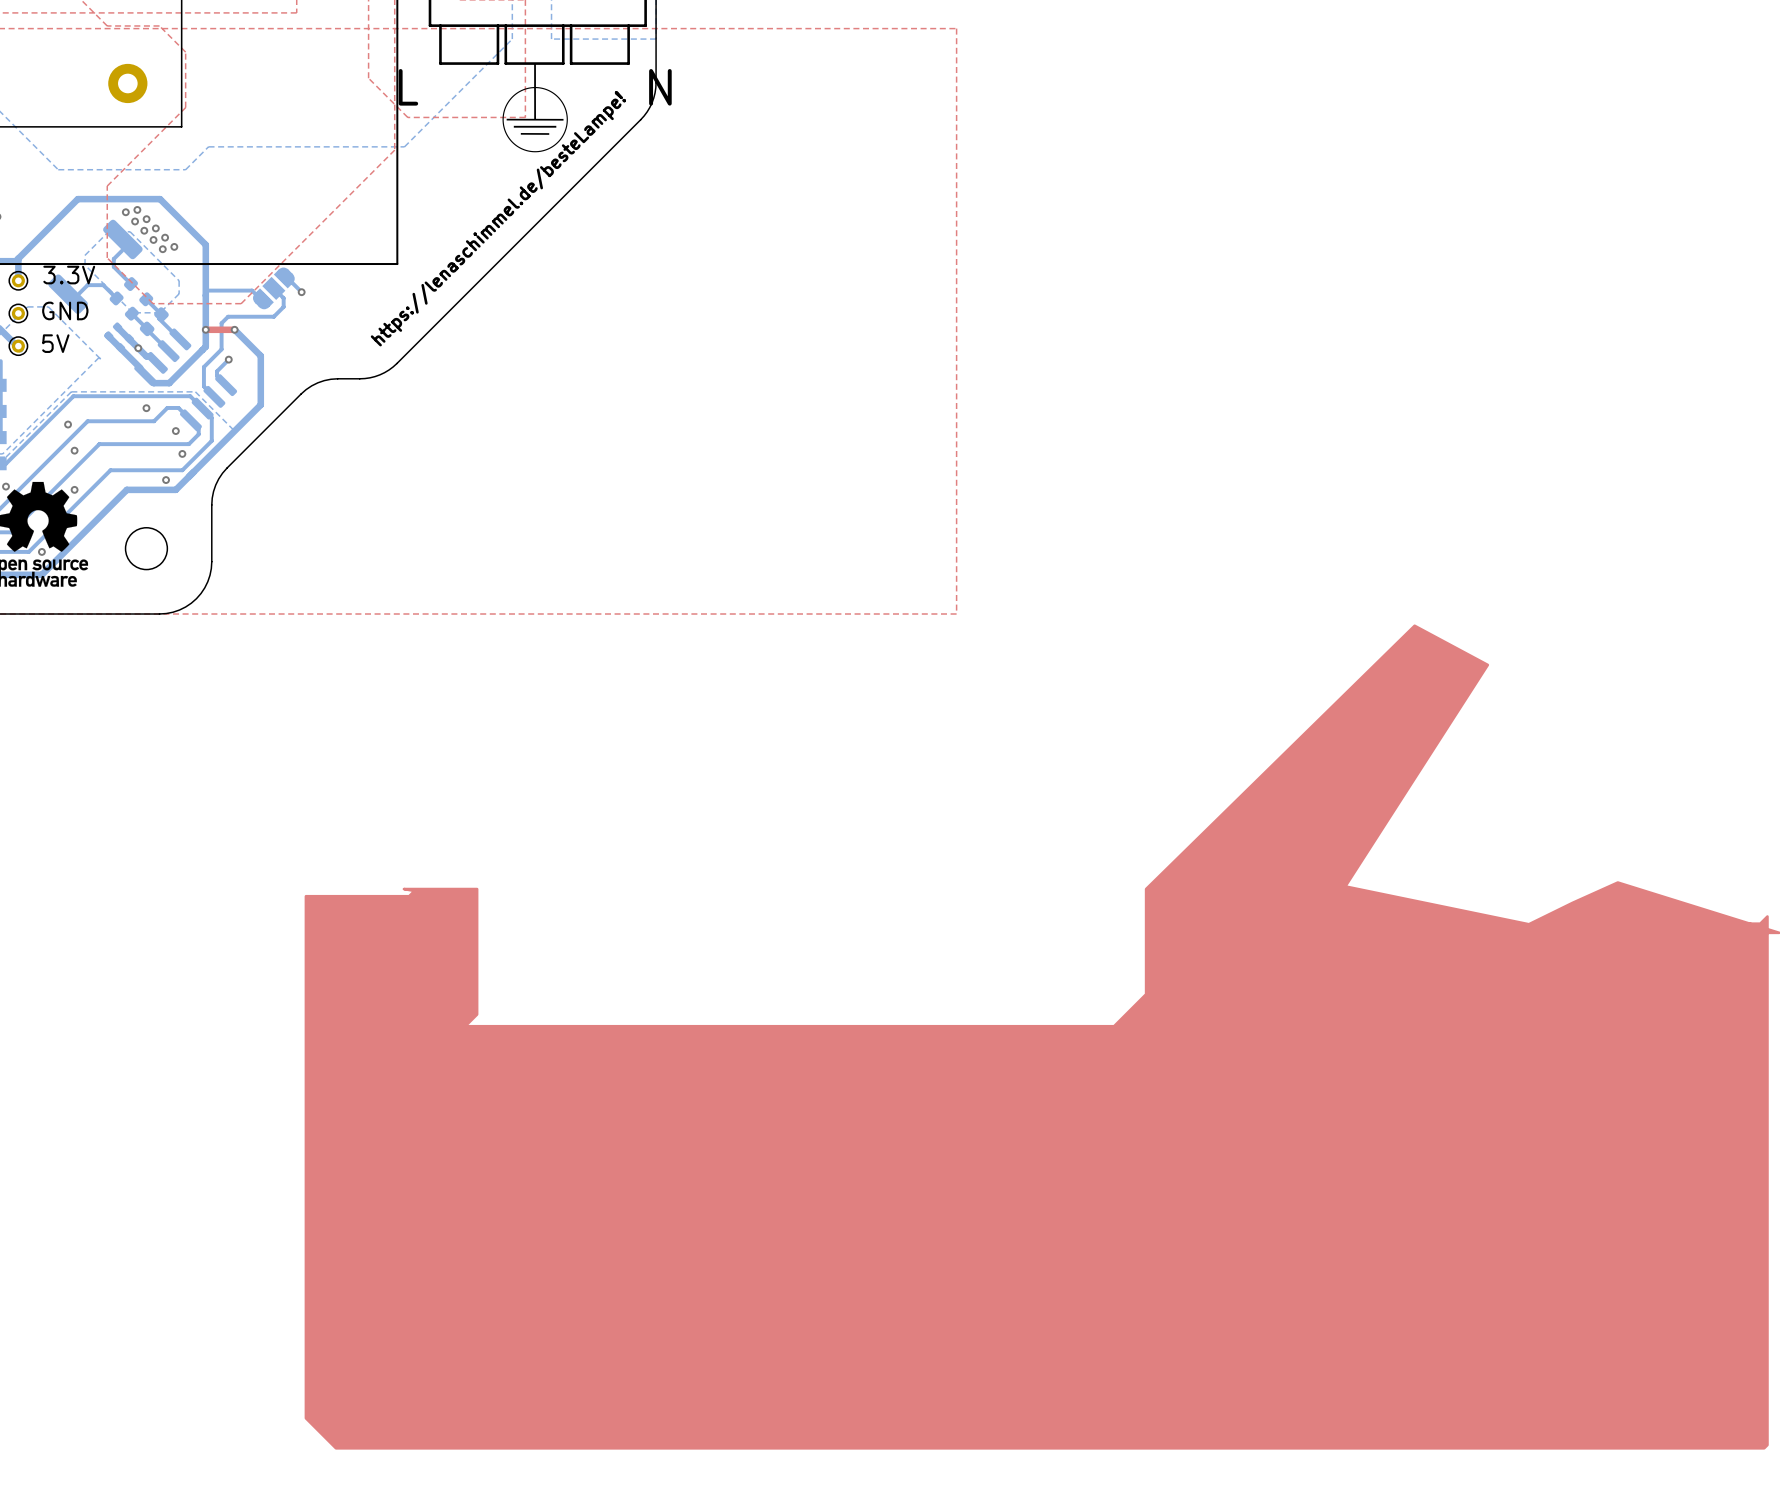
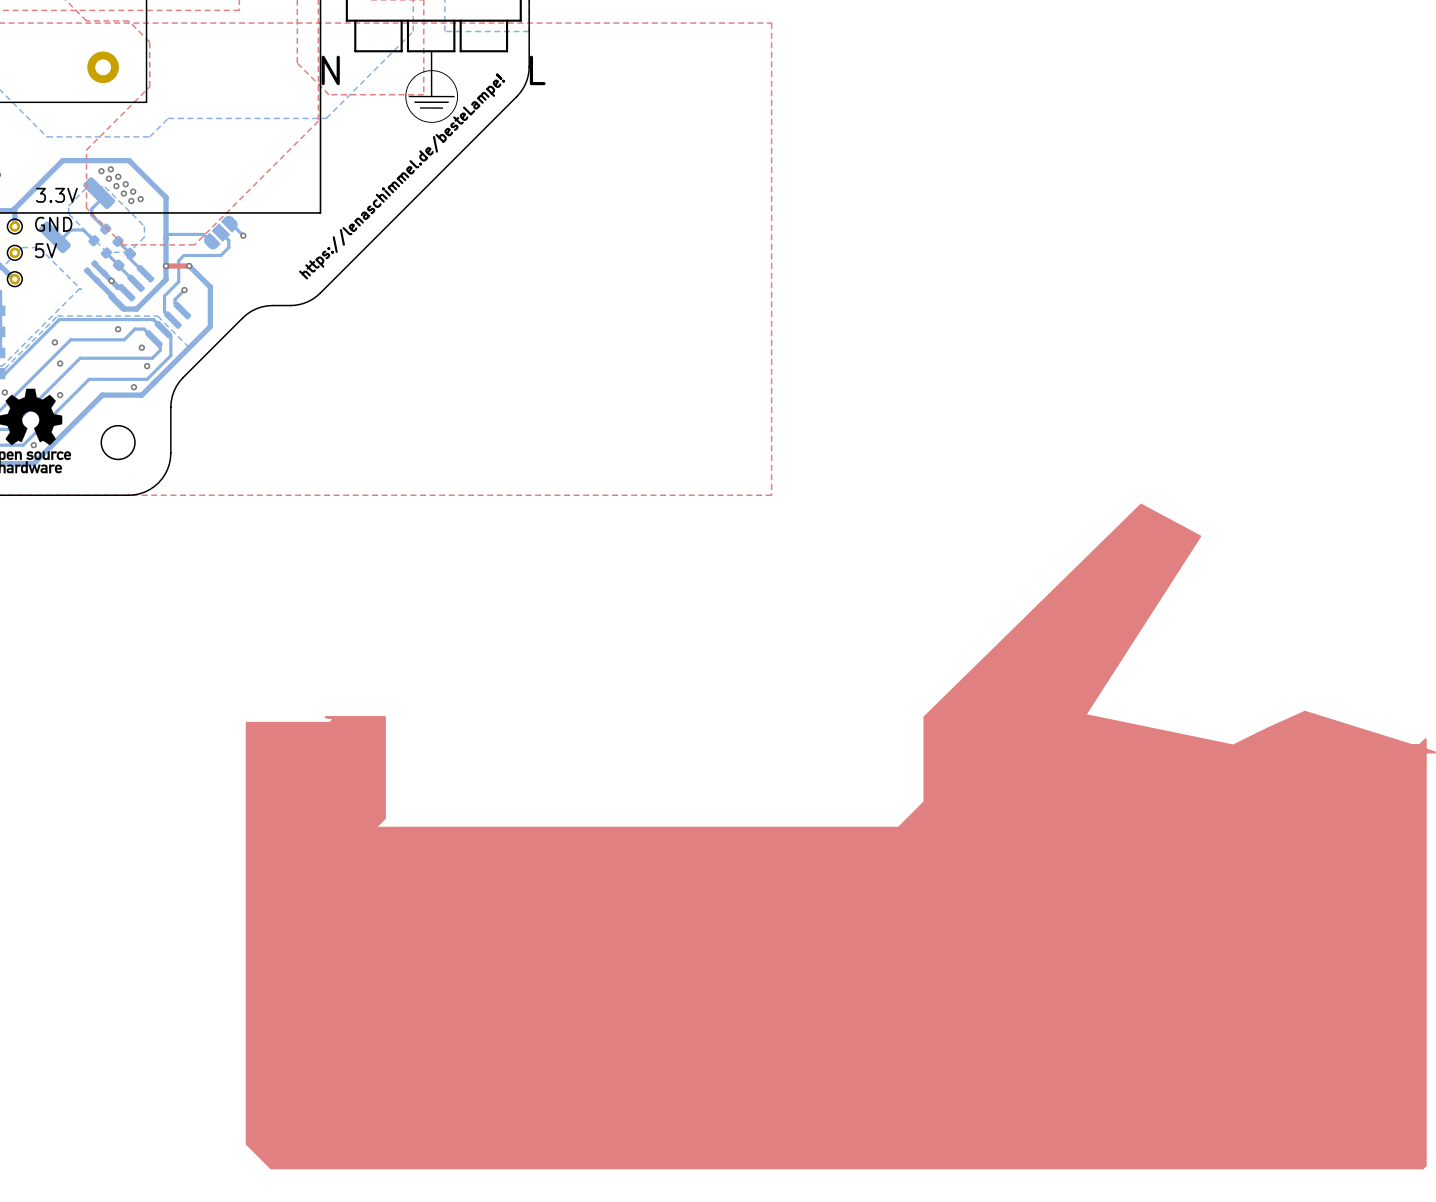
text: L N (535, 87) -> N L (433, 70)
text: none -> 3.3V (56, 195)
text: 3.3V (69, 275) -> GND (53, 224)
text: GND (65, 310) -> 5V (46, 250)
text: 5V (55, 343) -> none

